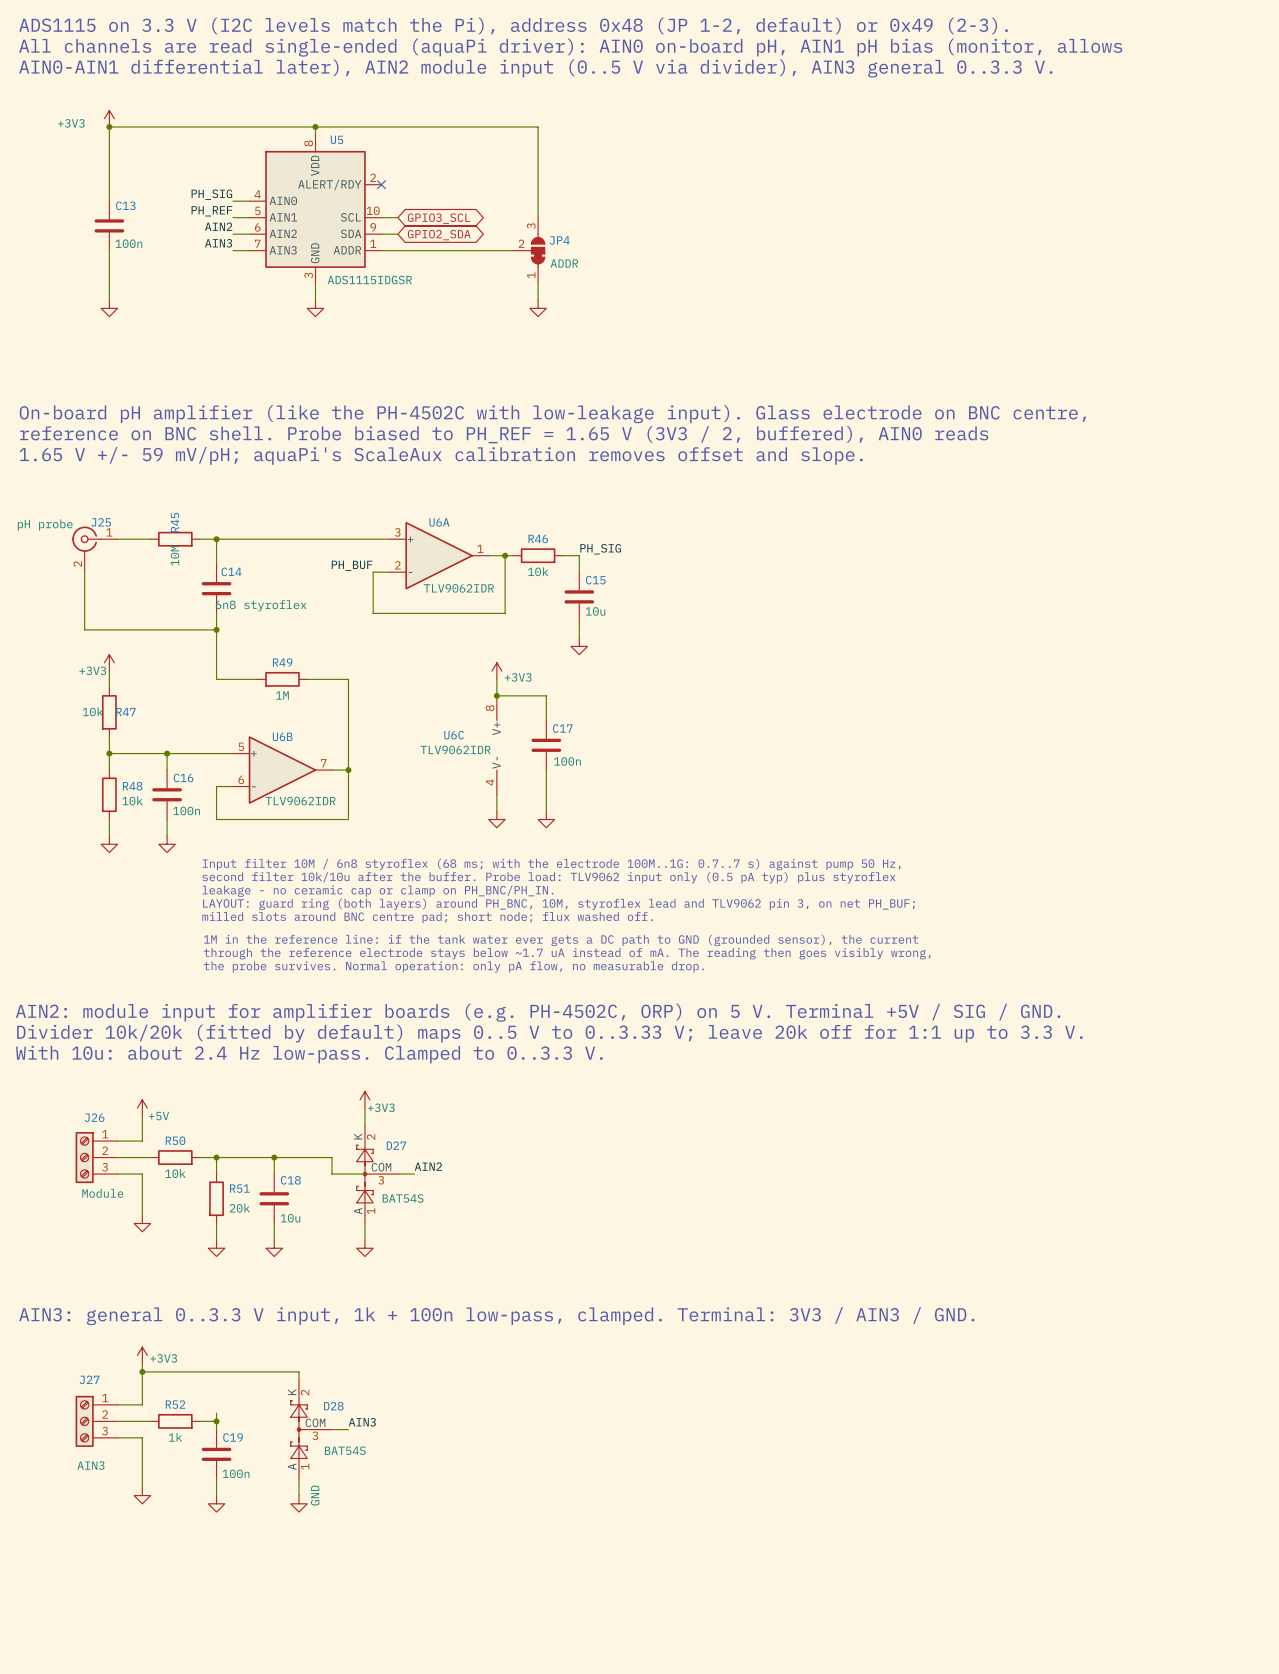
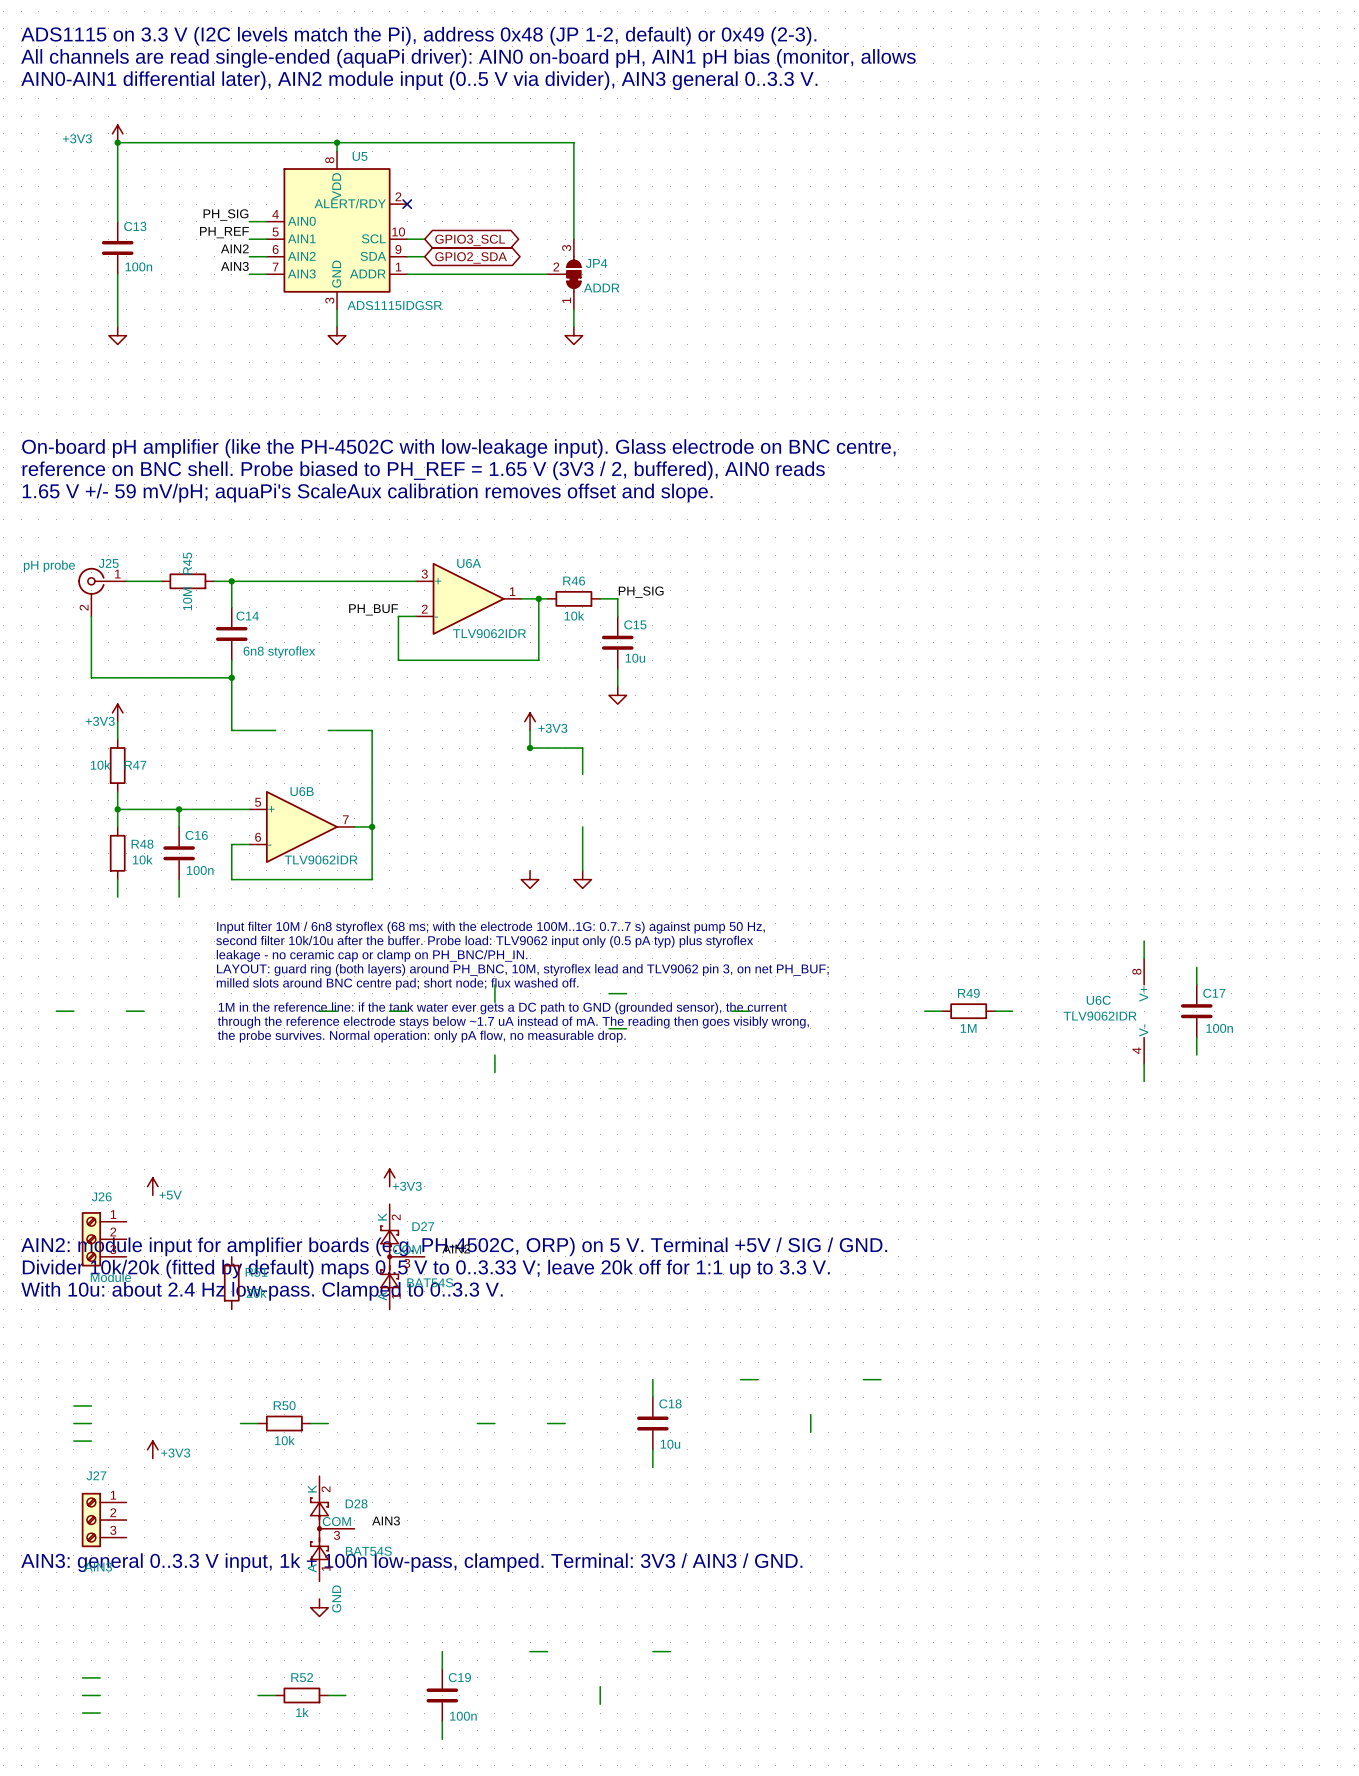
R49 position: (282, 679) -> (968, 1011)
U6C position: (496, 745) -> (1144, 1011)
C17 position: (546, 745) -> (1196, 1011)
wire: (496, 794) (496, 811) -> (494, 984) (494, 1002)
power symbol: (109, 844) -> none
power symbol: (167, 844) -> none
wire: none -> (1144, 941) (1144, 958)
wire: none -> (1196, 967) (1196, 984)
wire: none -> (608, 993) (626, 993)
wire: none -> (56, 1011) (73, 1011)
wire: none -> (126, 1011) (144, 1011)
wire: none -> (319, 1011) (337, 1011)
wire: none -> (389, 1011) (407, 1011)
wire: none -> (731, 1011) (749, 1011)
wire: none -> (924, 1011) (942, 1011)
wire: none -> (994, 1011) (1012, 1011)
wire: none -> (608, 1028) (626, 1028)
wire: none -> (1196, 1037) (1196, 1055)
wire: none -> (1144, 1063) (1144, 1081)
text position: AIN2: module input for amplifier boards (e.g. PH-4502C, ORP) on 5 V. Terminal +5V / SIG / GND. (538, 1012) -> AIN2: module input for amplifier boards (e.g. PH-4502C, ORP) on 5 V. Terminal +5V / SIG / GND. (454, 1246)
text position: Divider 10k/20k (fitted by default) maps 0..5 V to 0..3.33 V; leave 20k off for 1:1 up to 3.3 V. (549, 1033) -> Divider 10k/20k (fitted by default) maps 0..5 V to 0..3.33 V; leave 20k off for 1:1 up to 3.3 V. (426, 1269)
text position: With 10u: about 2.4 Hz low-pass. Clamped to 0..3.3 V. (309, 1054) -> With 10u: about 2.4 Hz low-pass. Clamped to 0..3.3 V. (261, 1291)
wire: (364, 1108) (364, 1124) -> (494, 1055) (494, 1072)
wire: (142, 1116) (142, 1141) (117, 1141) -> none
wire: (117, 1157) (150, 1157) -> none
R50 position: (175, 1157) -> (284, 1423)
wire: (200, 1157) (331, 1157) (331, 1174) (364, 1174) -> none
wire: (216, 1157) (216, 1174) -> none
junction: (216, 1157) -> none
wire: (274, 1157) (274, 1174) -> none
junction: (274, 1157) -> none
wire: (117, 1174) (142, 1174) (142, 1215) -> none
wire: (397, 1174) (414, 1174) -> none
C18 position: (274, 1198) -> (652, 1423)
power symbol: (142, 1223) -> none
wire: (216, 1223) (216, 1239) -> none
wire: (274, 1223) (274, 1239) -> none
wire: (364, 1223) (364, 1239) -> none
power symbol: (216, 1248) -> none
power symbol: (274, 1248) -> none
power symbol: (364, 1248) -> none
wire: none -> (652, 1379) (652, 1397)
wire: none -> (740, 1379) (758, 1379)
wire: none -> (863, 1379) (880, 1379)
wire: none -> (73, 1405) (91, 1405)
text position: AIN3: general 0..3.3 V input, 1k + 100n low-pass, clamped. Terminal: 3V3 / AIN3 / GND. (496, 1316) -> AIN3: general 0..3.3 V input, 1k + 100n low-pass, clamped. Terminal: 3V3 / AIN3 / GND. (411, 1562)
wire: none -> (810, 1414) (810, 1432)
wire: none -> (73, 1423) (91, 1423)
wire: none -> (477, 1423) (494, 1423)
wire: none -> (547, 1423) (565, 1423)
wire: none -> (73, 1441) (91, 1441)
wire: none -> (652, 1449) (652, 1467)
wire: (142, 1363) (142, 1404) (117, 1404) -> none
wire: (142, 1371) (299, 1371) (299, 1380) -> none
junction: (142, 1371) -> none
wire: (216, 1413) (216, 1429) -> none
wire: (117, 1421) (150, 1421) -> none
R52 position: (175, 1421) -> (301, 1695)
wire: (200, 1421) (216, 1421) -> (240, 1423) (258, 1423)
junction: (216, 1421) -> none
wire: (331, 1429) (348, 1429) -> (310, 1423) (328, 1423)
wire: (117, 1437) (142, 1437) (142, 1487) -> none
C19 position: (216, 1454) -> (442, 1695)
wire: (216, 1479) (216, 1495) -> none
wire: (299, 1479) (299, 1495) -> (442, 1651) (442, 1669)
power symbol: (142, 1495) -> none
power symbol: (216, 1503) -> none
wire: none -> (530, 1651) (547, 1651)
wire: none -> (652, 1651) (670, 1651)
wire: none -> (82, 1677) (100, 1677)
wire: none -> (600, 1686) (600, 1704)
wire: none -> (82, 1695) (100, 1695)
wire: none -> (258, 1695) (275, 1695)
wire: none -> (328, 1695) (345, 1695)
wire: none -> (82, 1713) (100, 1713)
wire: none -> (442, 1721) (442, 1739)

